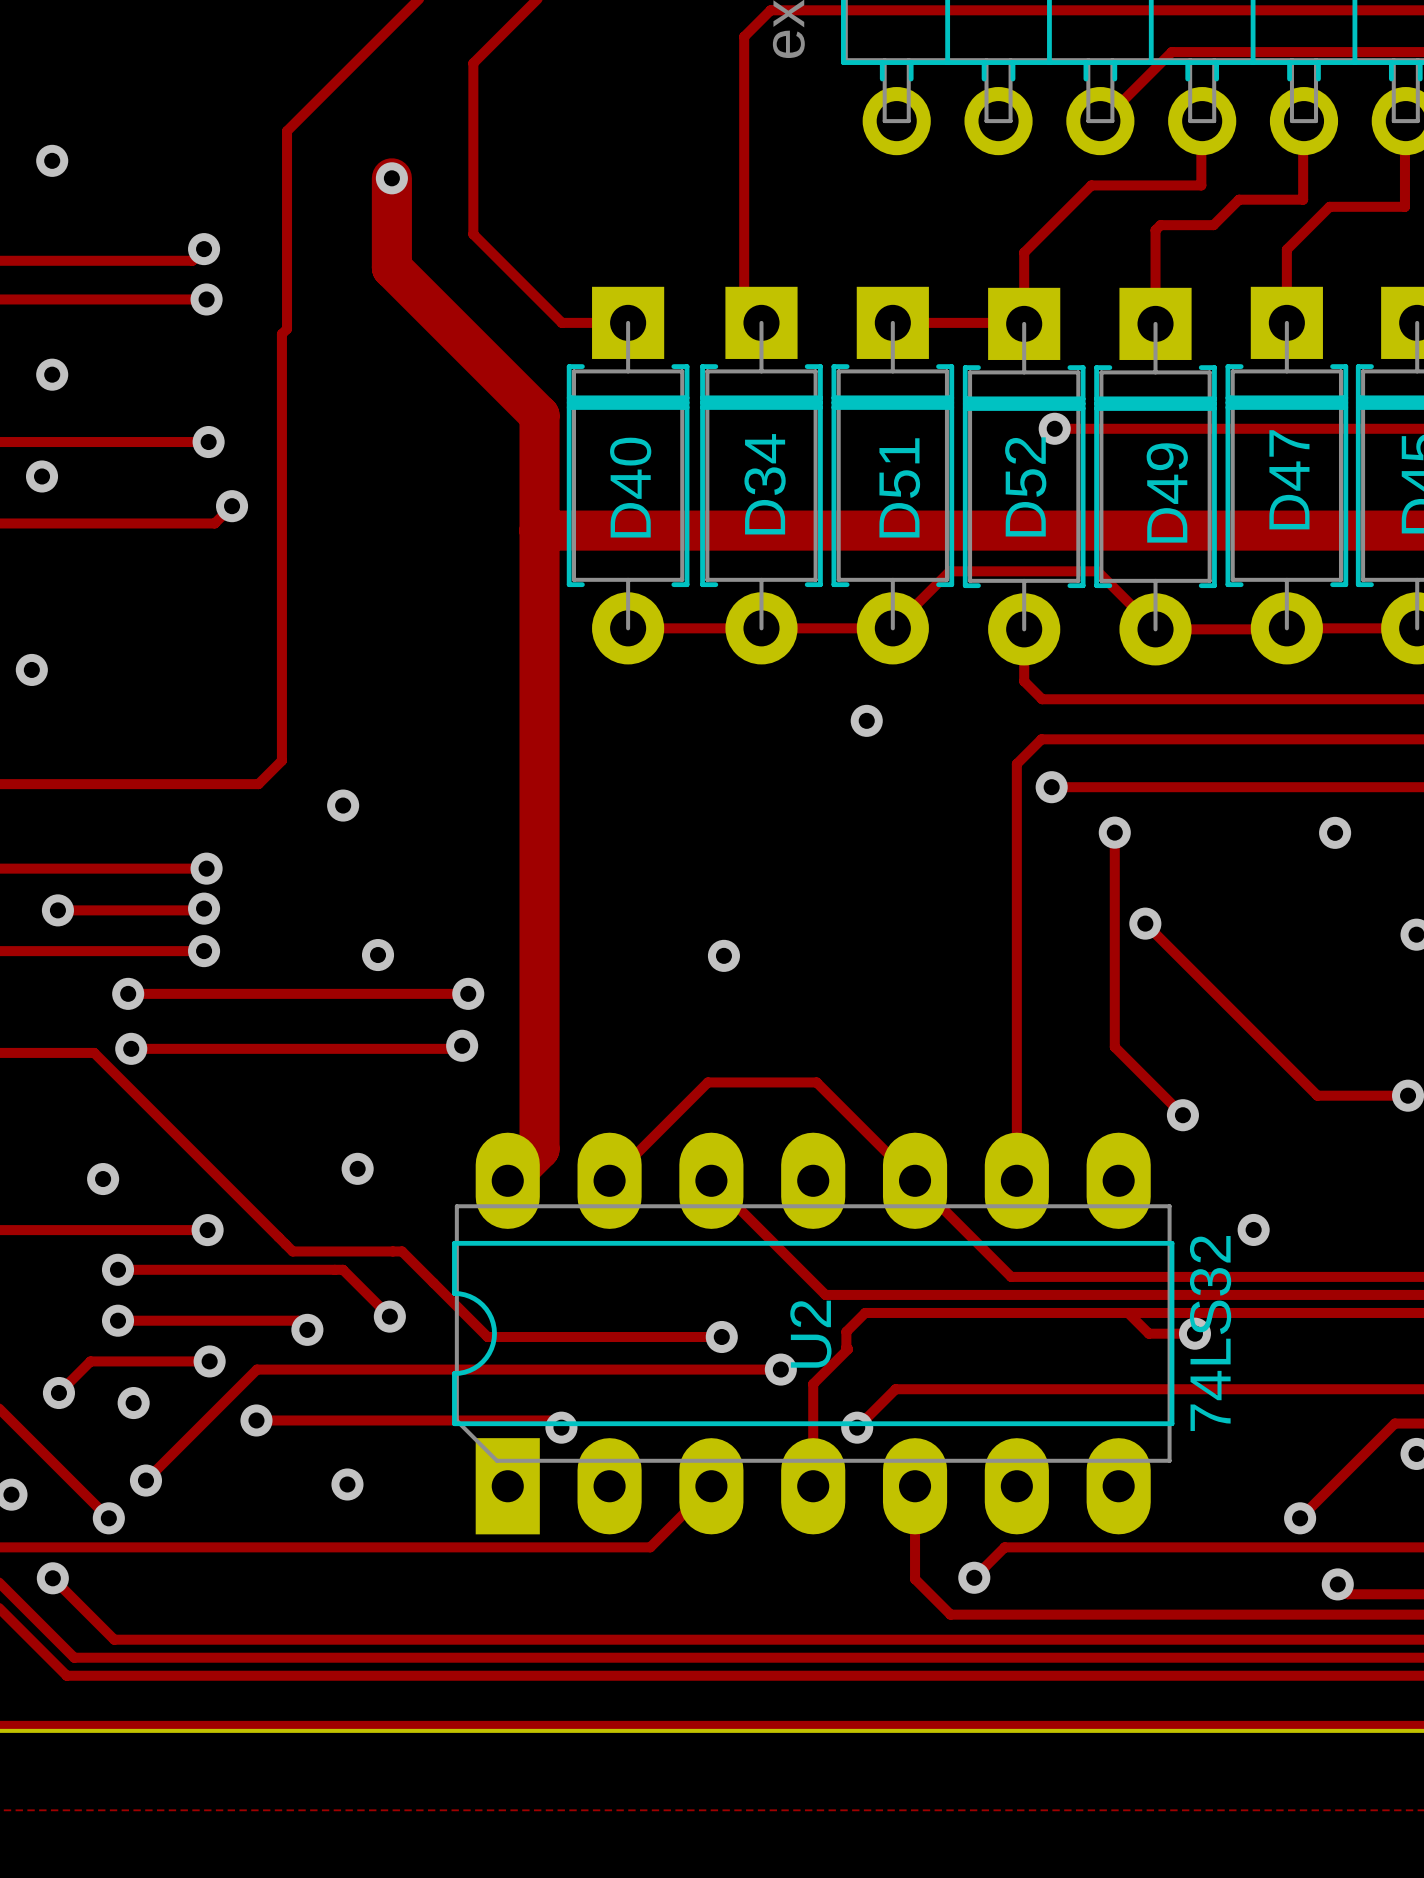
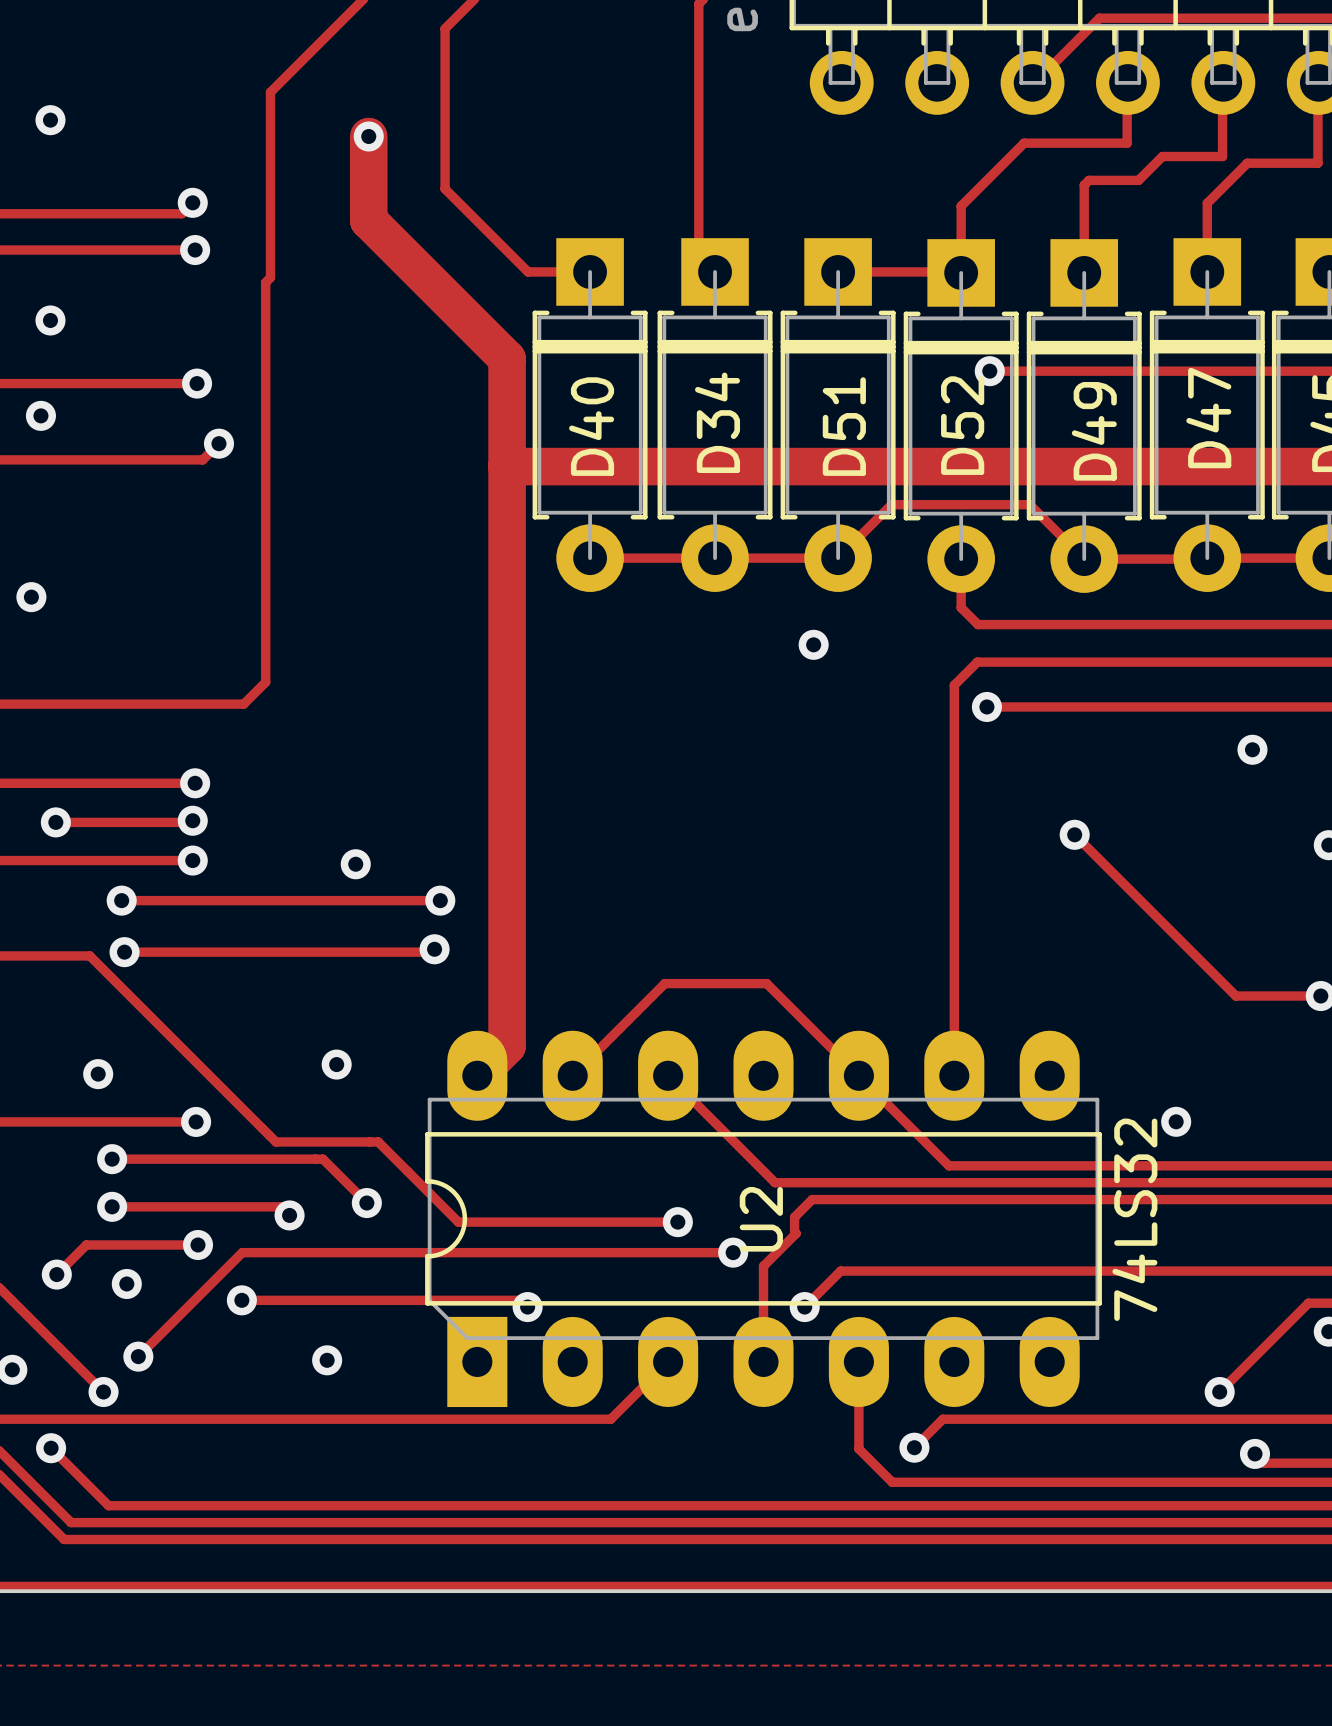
via: (343, 805) -> none
track: (1114, 832) (1114, 1047) (1182, 1115) -> none
via: (1114, 832) -> none
via: (723, 955) -> none
via: (1182, 1115) -> none
track: (1128, 1312) (1148, 1333) (1194, 1333) -> none
via: (1194, 1333) -> none

